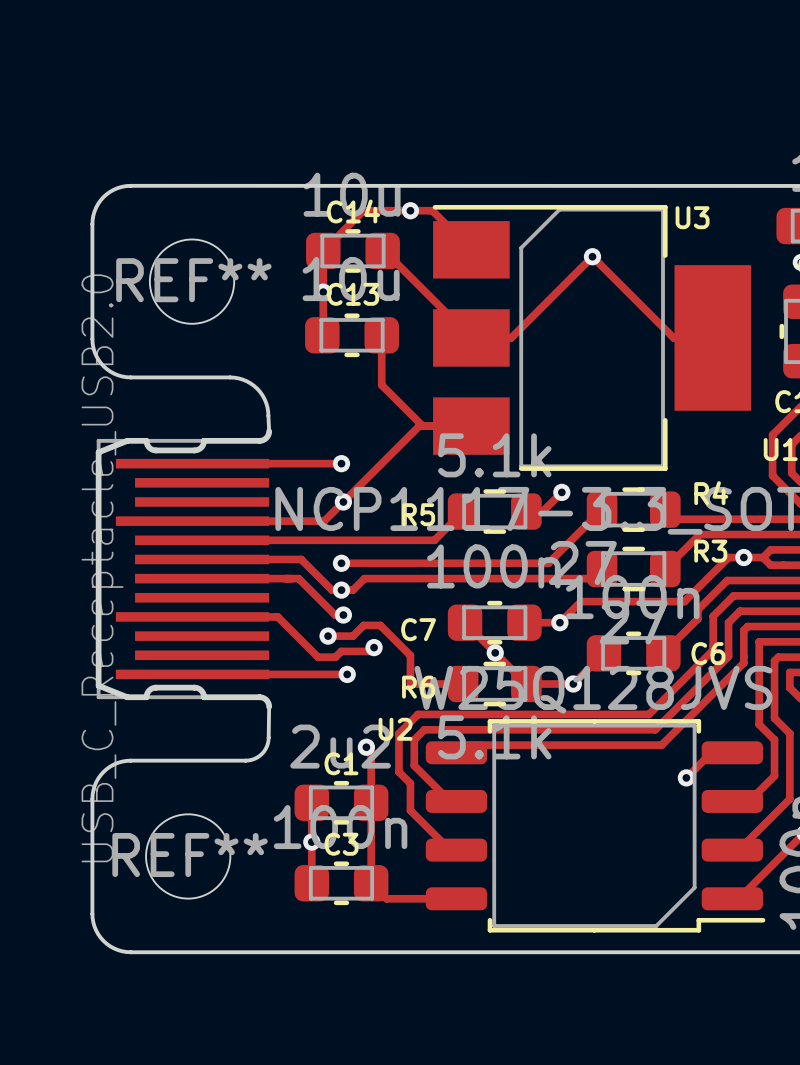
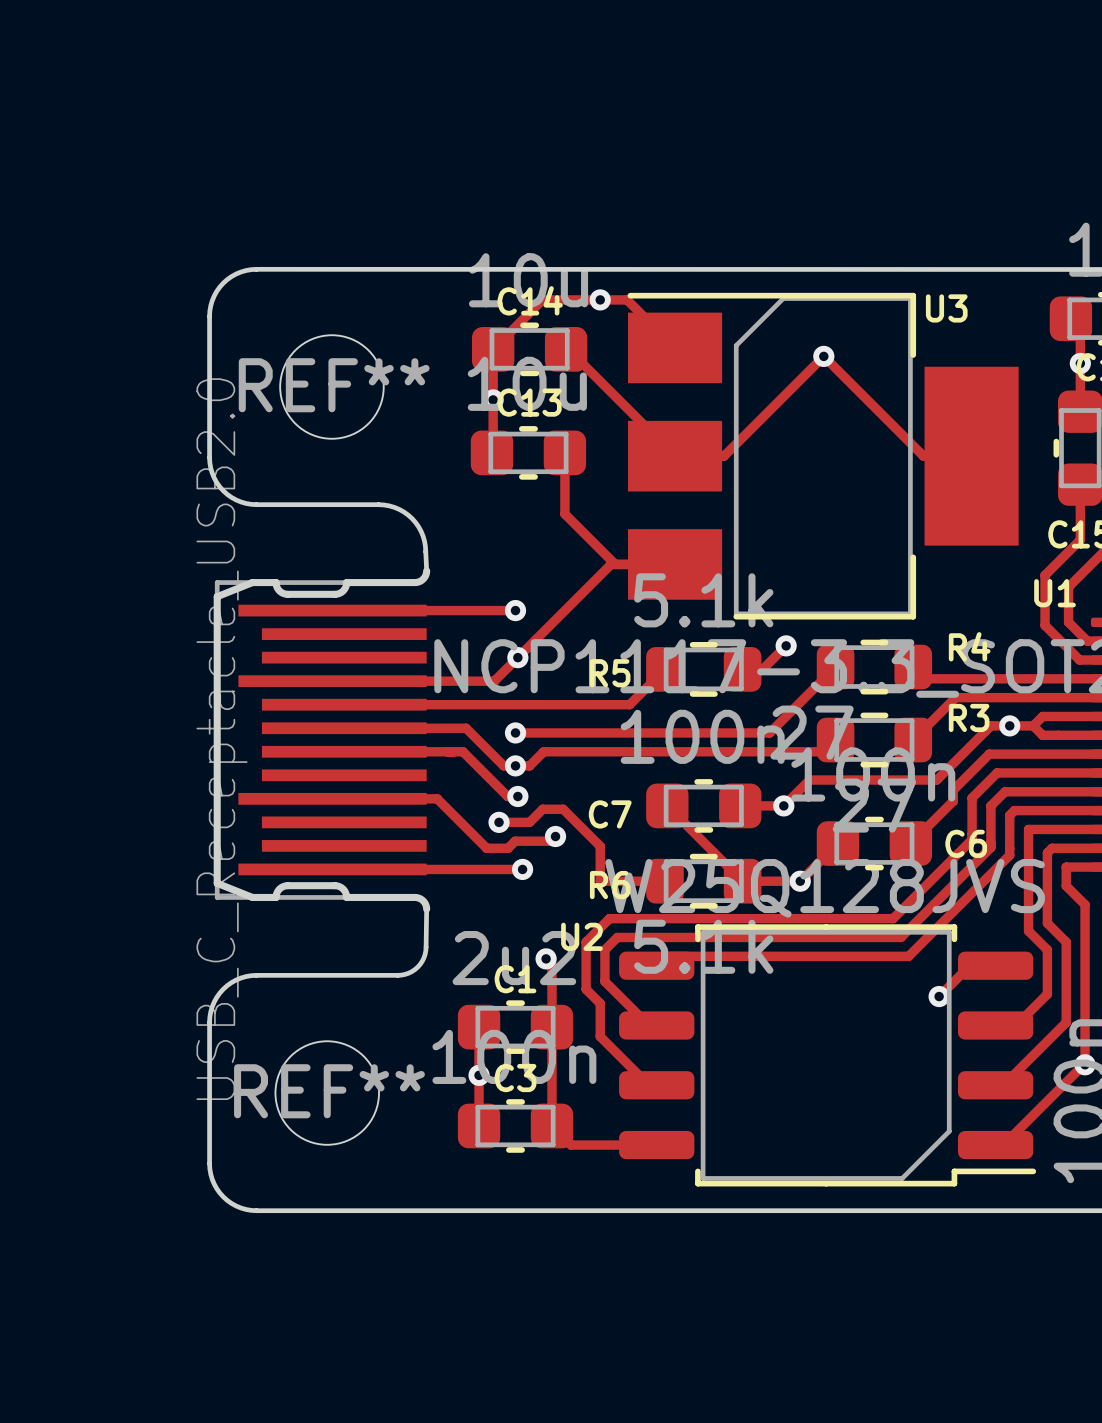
via: (495, 652) -> none

